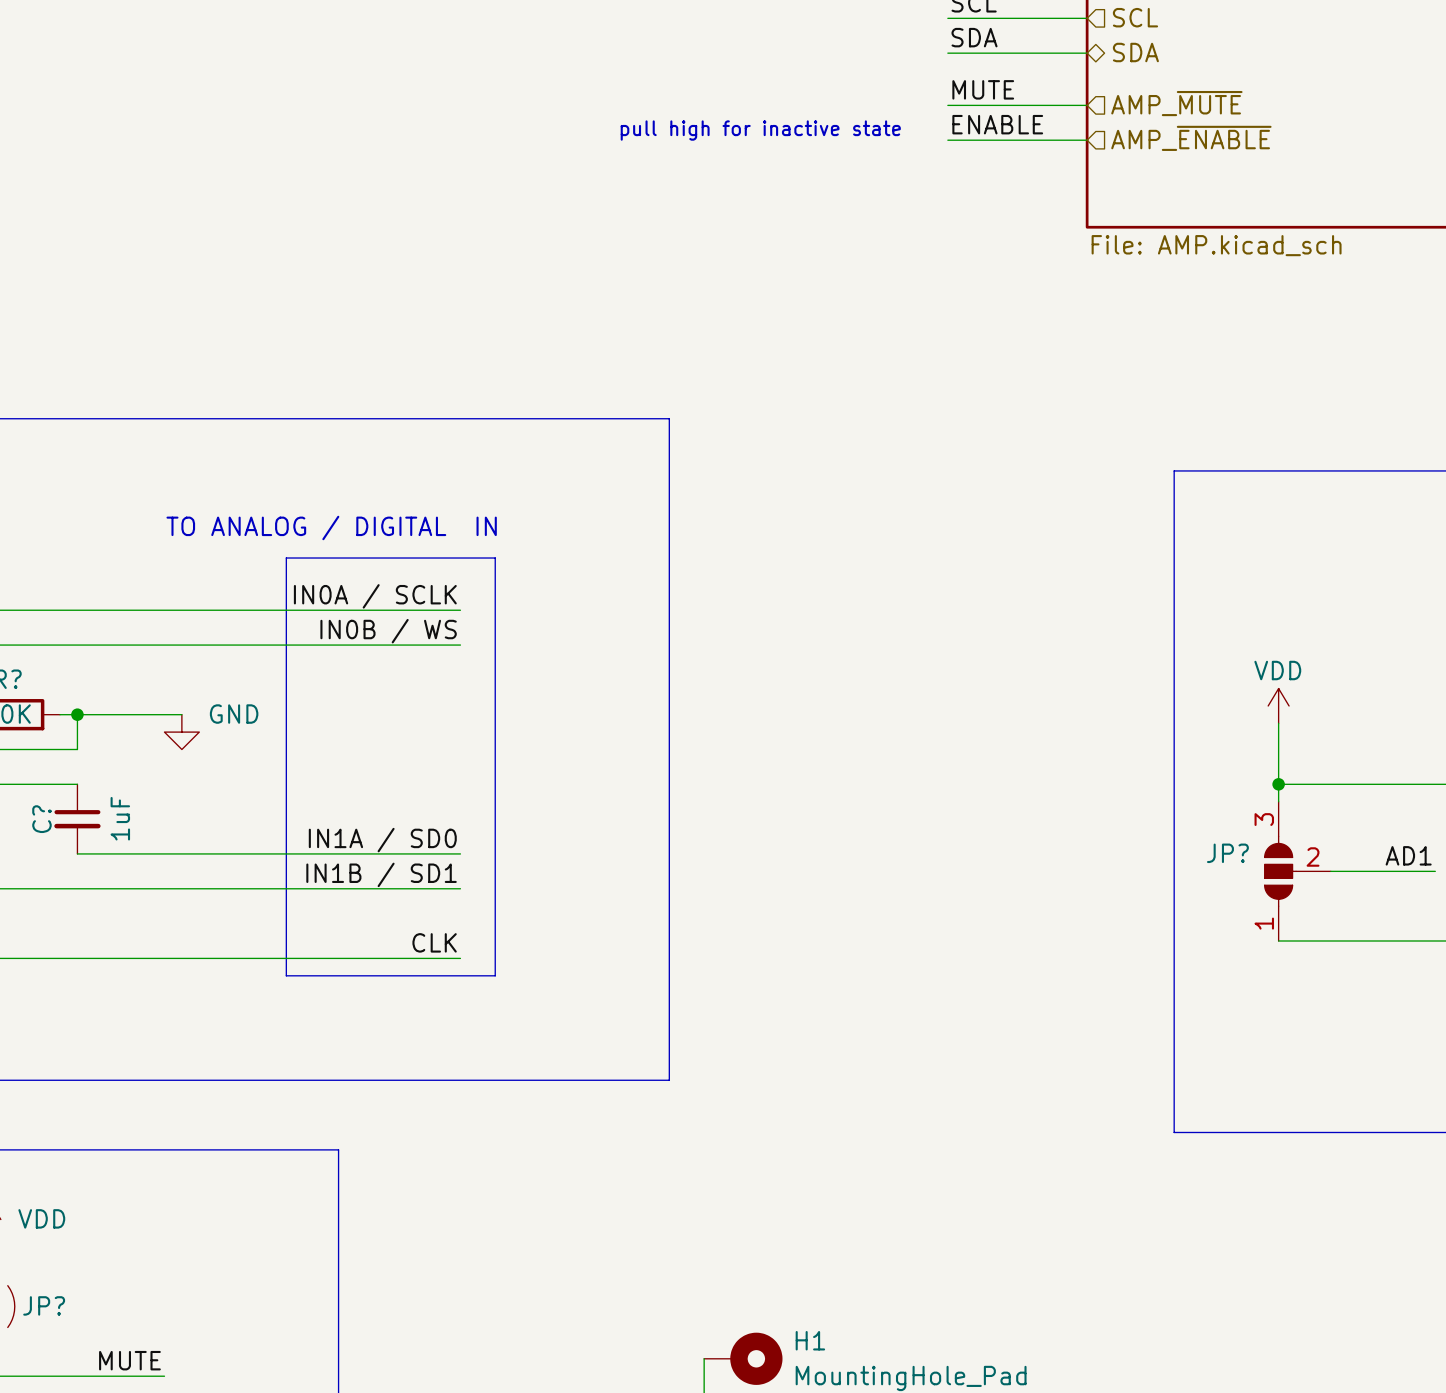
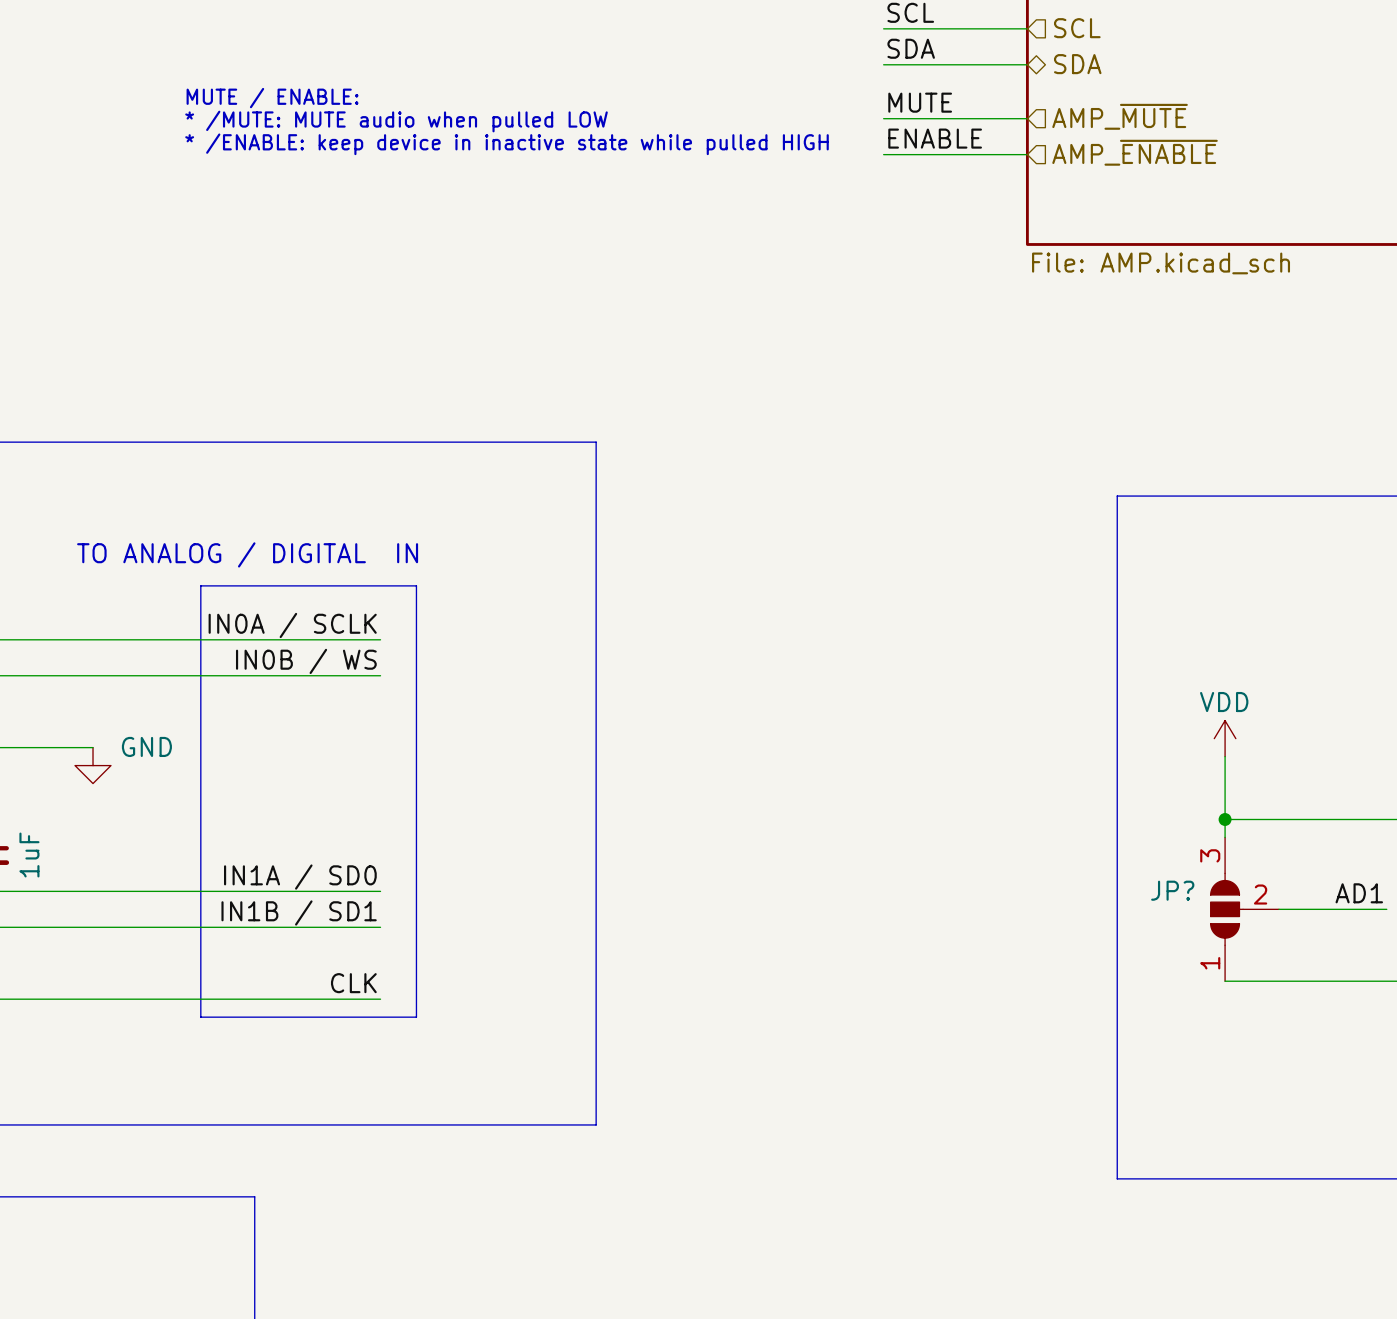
text: none -> MUTE / ENABLE: (272, 98)
text: none -> * /MUTE: MUTE audio when pulled LOW (396, 121)
text: none -> * /ENABLE: keep device in inactive state while pulled HIGH (507, 144)
text: pull high for inactive state (760, 130) -> none

